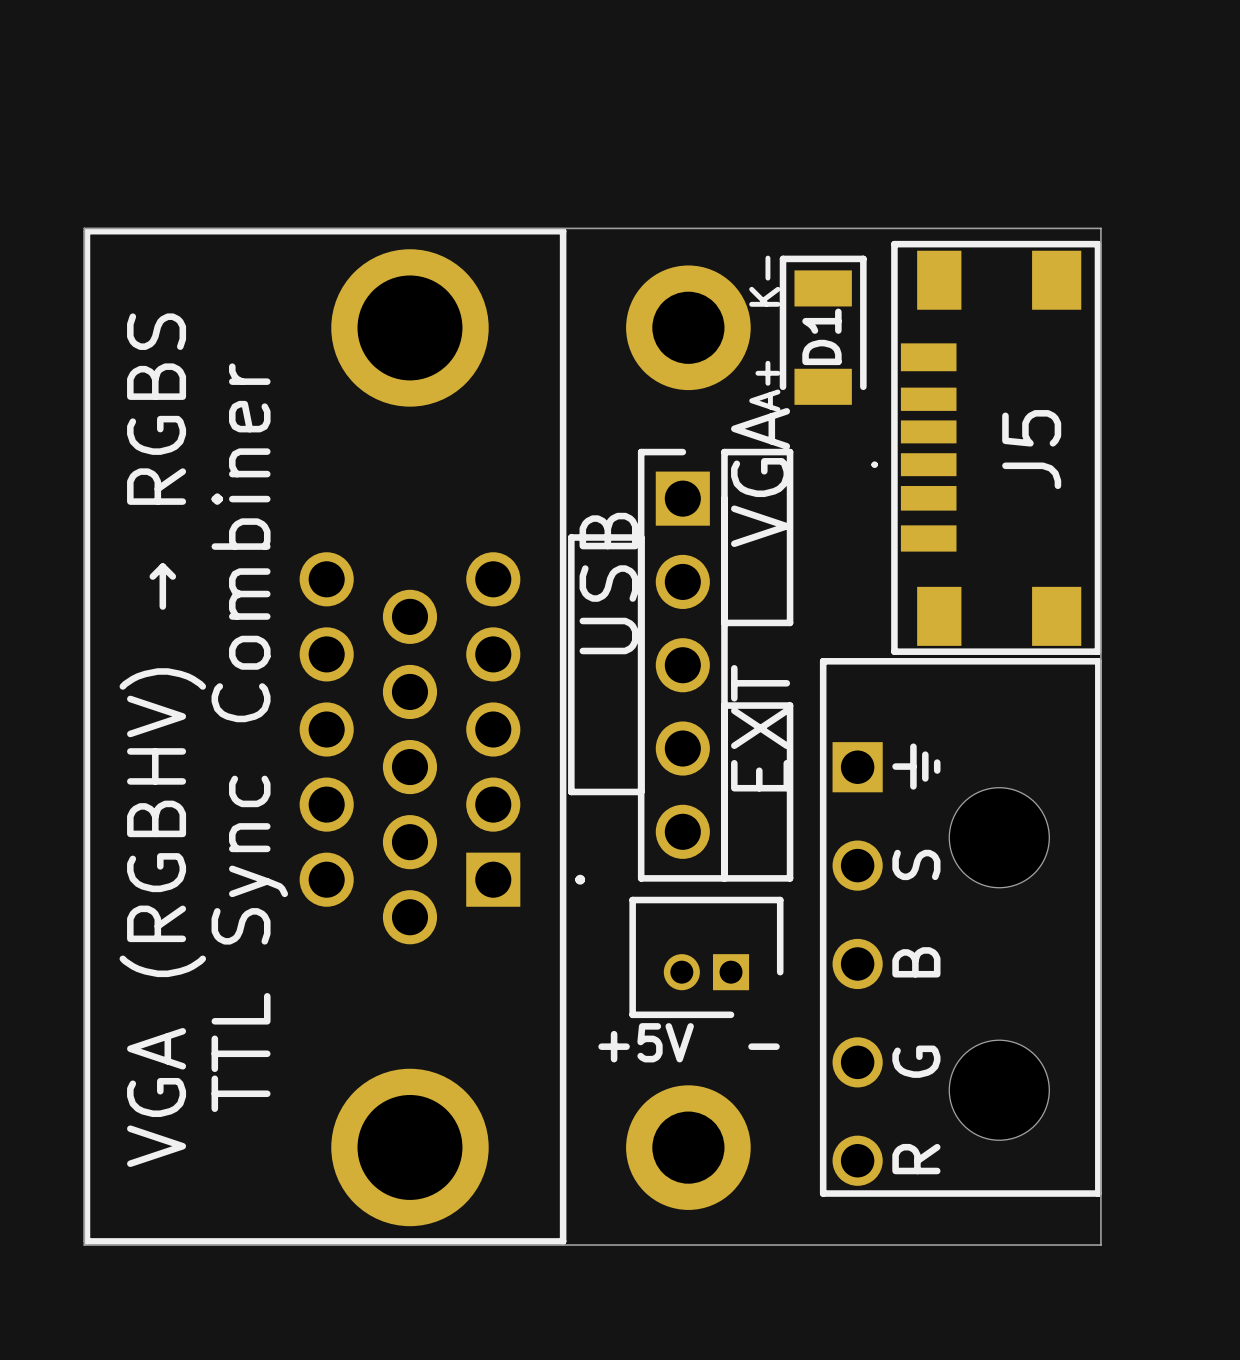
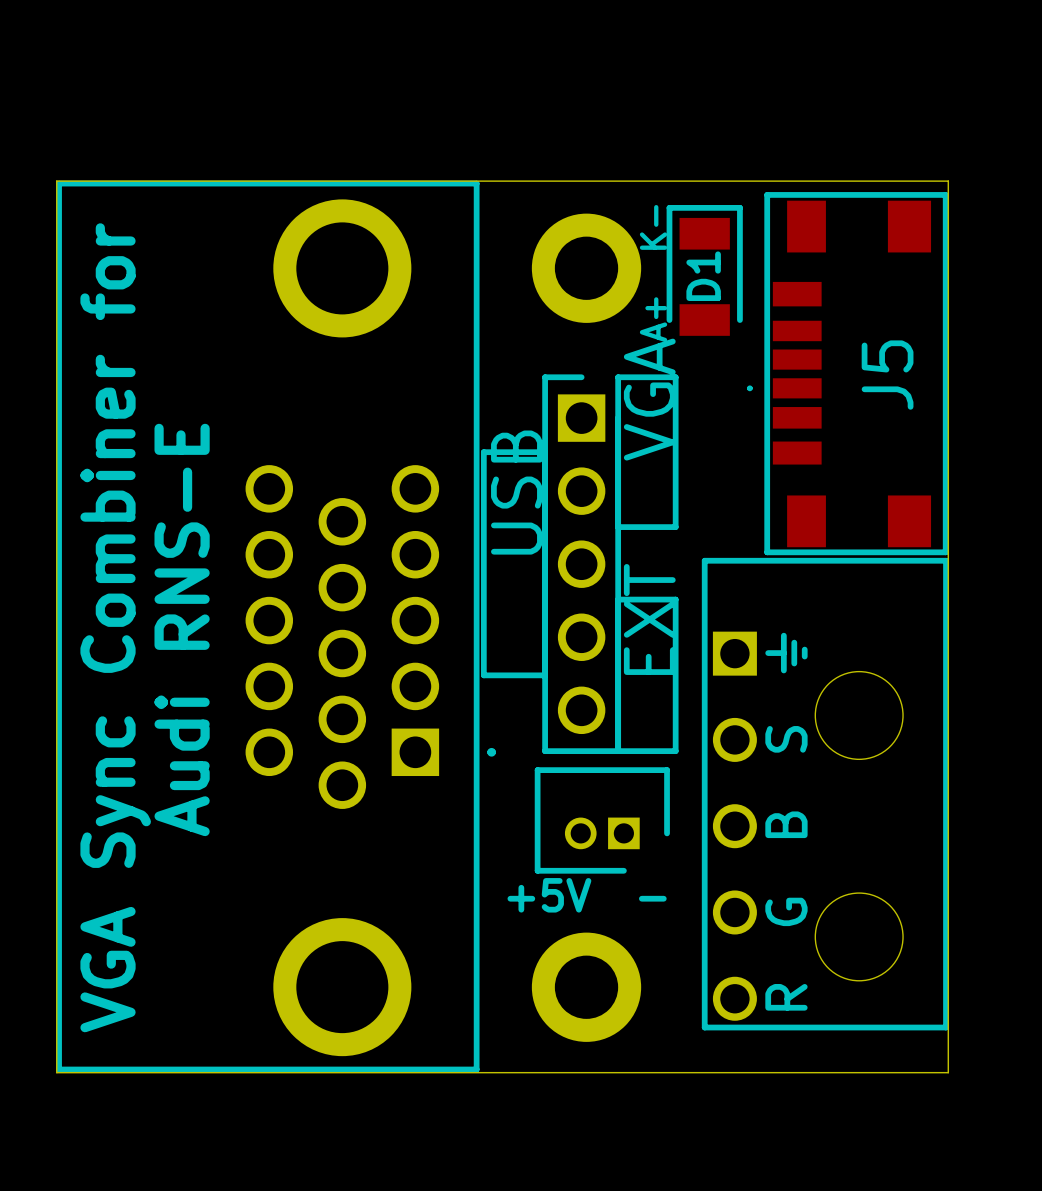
text: TTL Sync Combiner (249, 737) -> Audi RNS-E (182, 629)
text: VGA (RGBHV) → RGBS (162, 740) -> VGA Sync Combiner for (115, 627)

